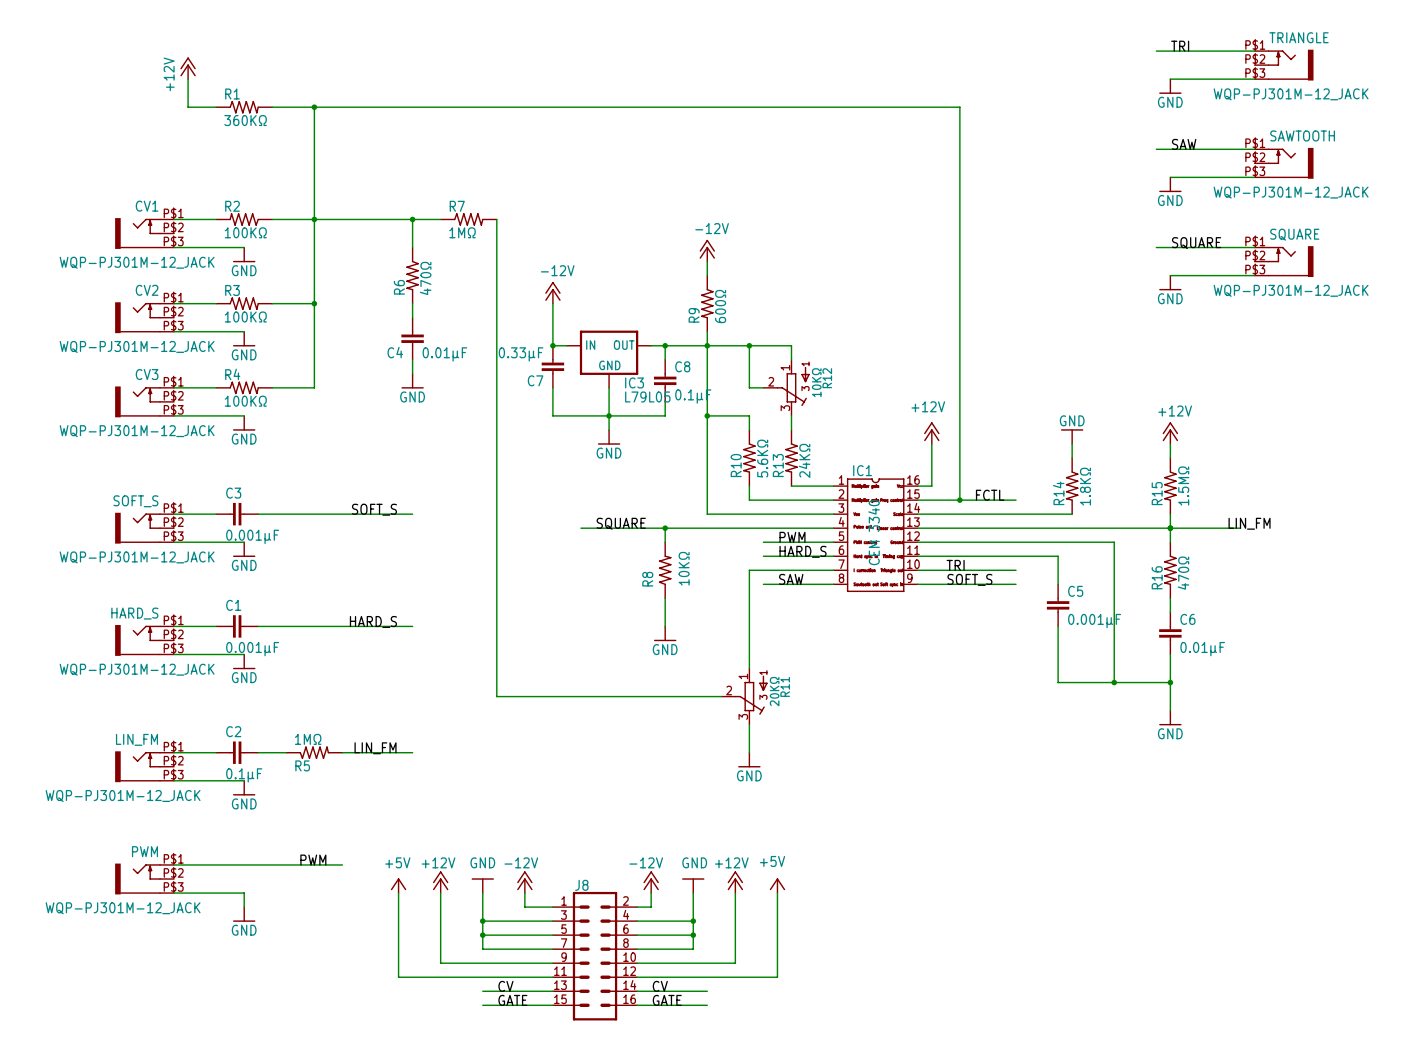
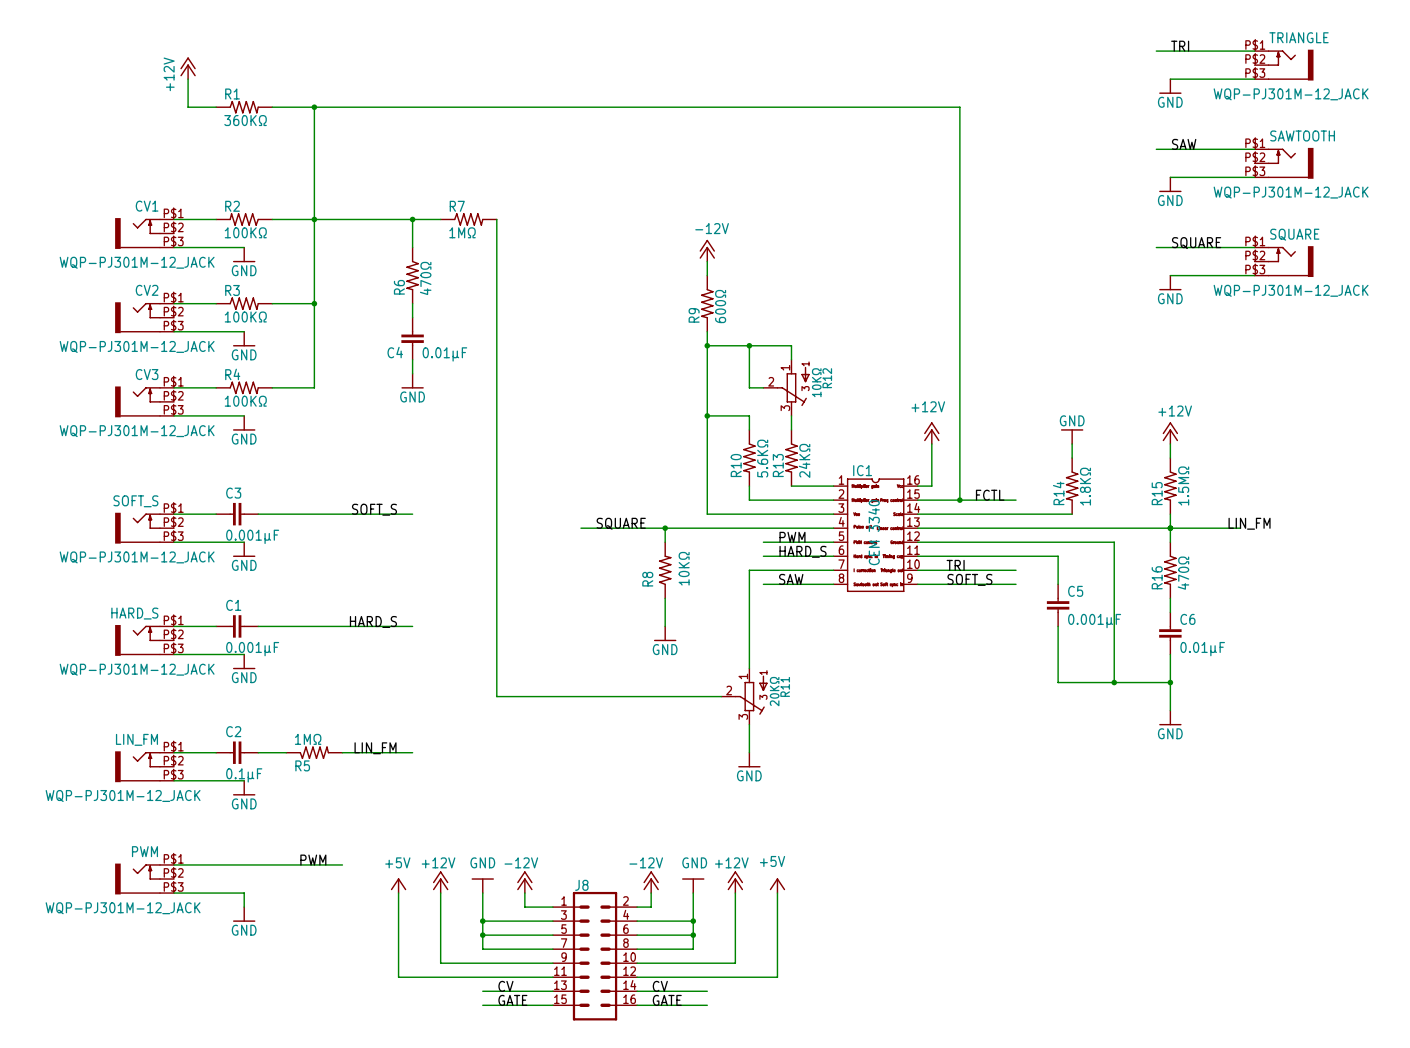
power symbol: -12V (552, 292) -> none
wire: (552, 303) (552, 345) (566, 345) -> none
junction: (552, 345) -> none
wire: (651, 345) (707, 345) -> none
wire: (665, 345) (665, 359) -> none
junction: (665, 345) -> none
IC3: L79L05 (609, 359) -> none
C7: 0.33μF (552, 366) -> none
C8: 0.1μF (665, 380) -> none
wire: (552, 387) (552, 415) (665, 415) (665, 401) -> none
wire: (609, 387) (609, 429) -> none
junction: (609, 415) -> none
power symbol: GND (609, 437) -> none

